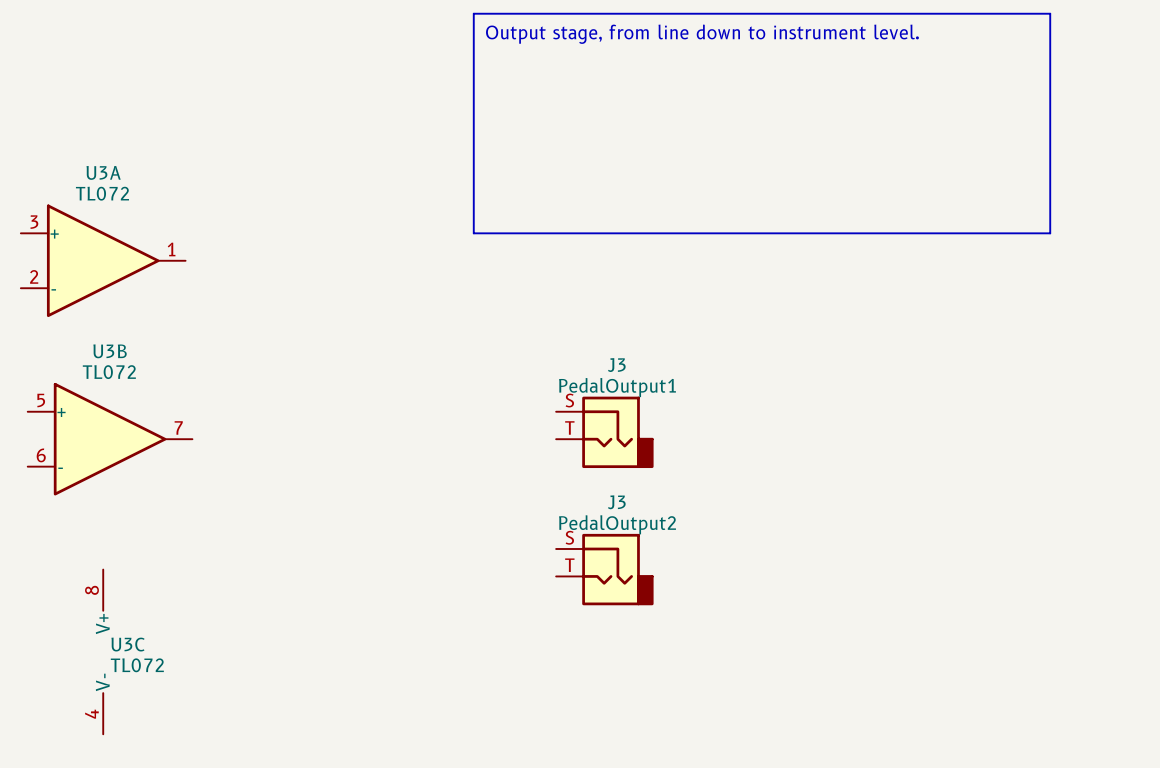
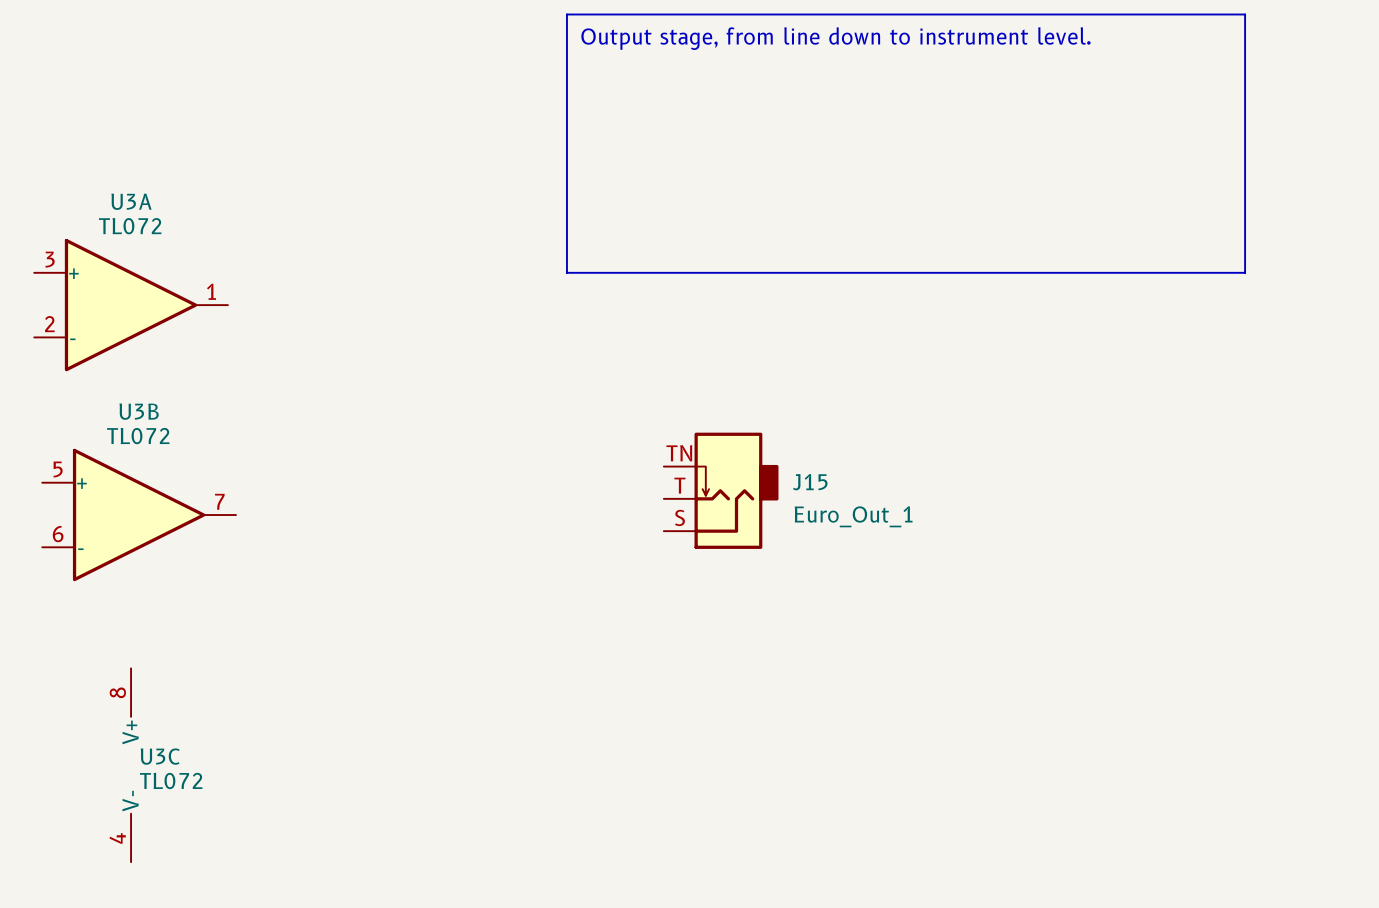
J15: none -> Euro_Out_1 (721, 490)
J3: PedalOutput1 (604, 432) -> none
J3: PedalOutput2 (604, 569) -> none

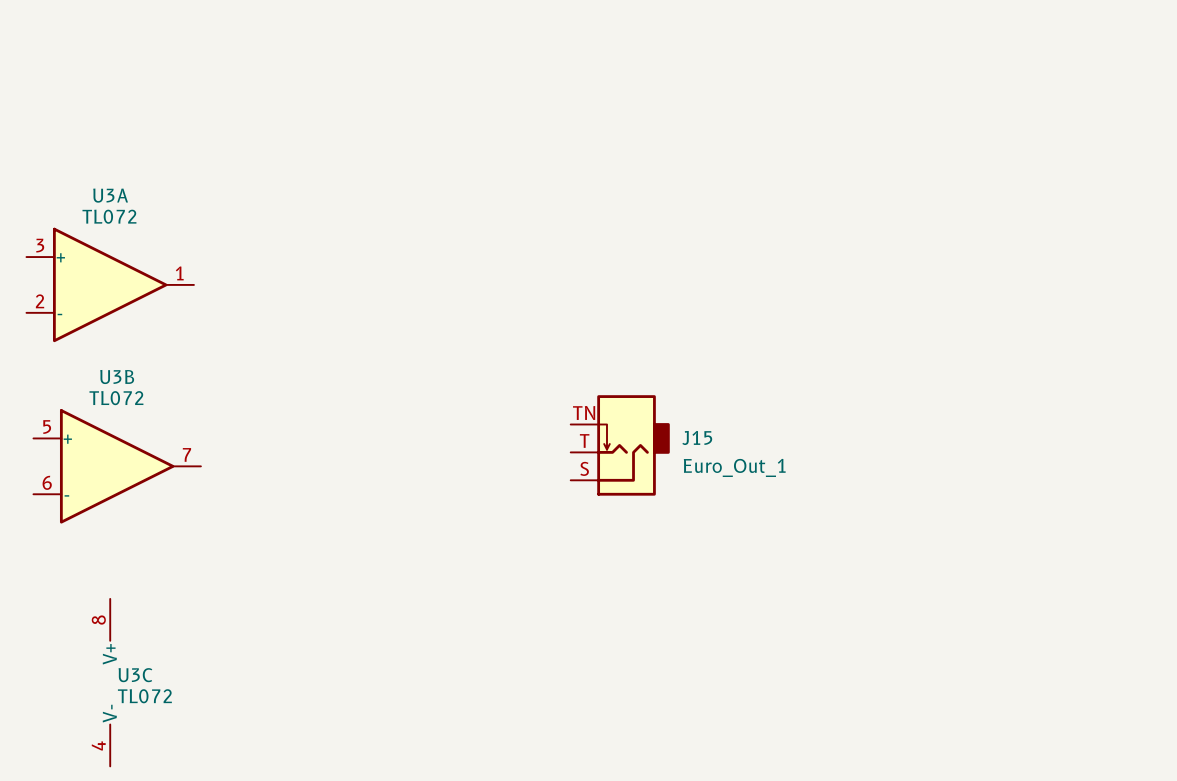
line: (566, 14) (1245, 14) (1245, 272) (566, 272) (566, 14) -> none
text: Output stage, from line down to instrument level. (835, 38) -> none

